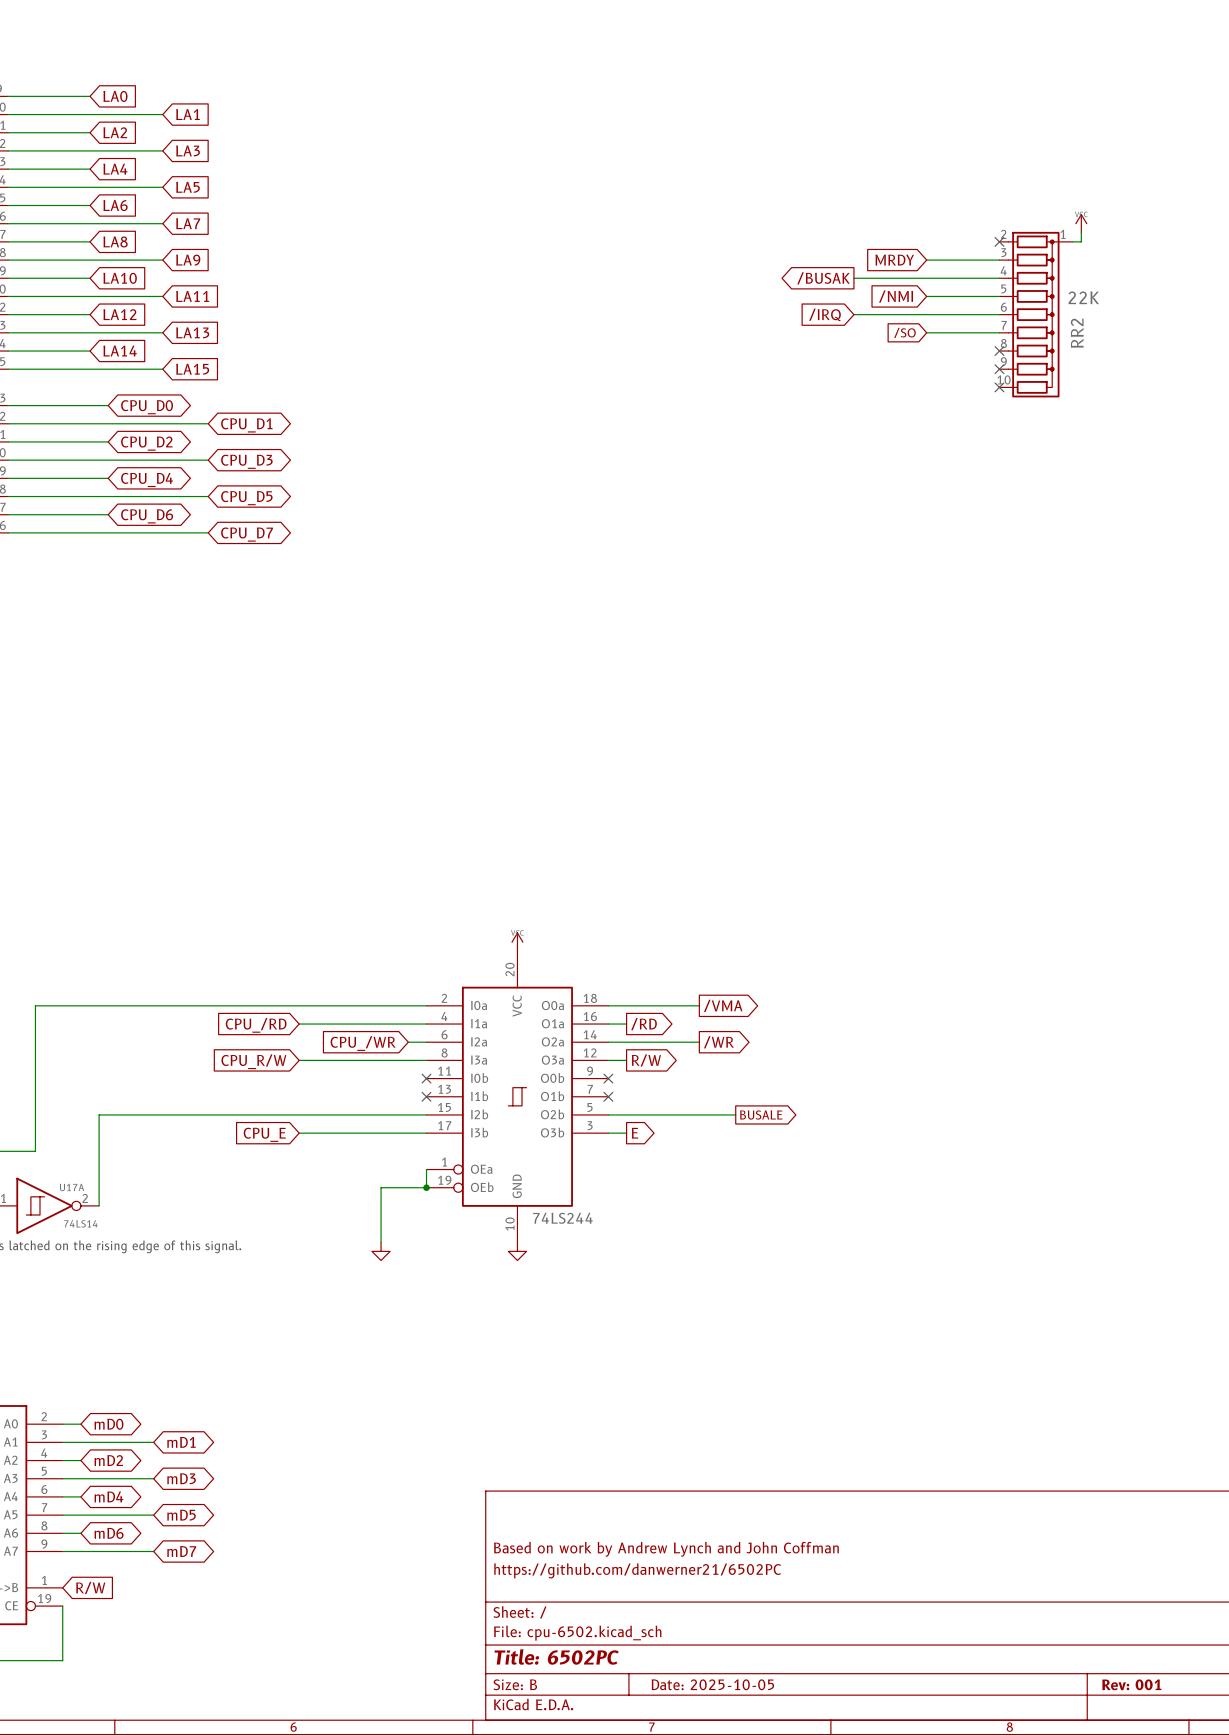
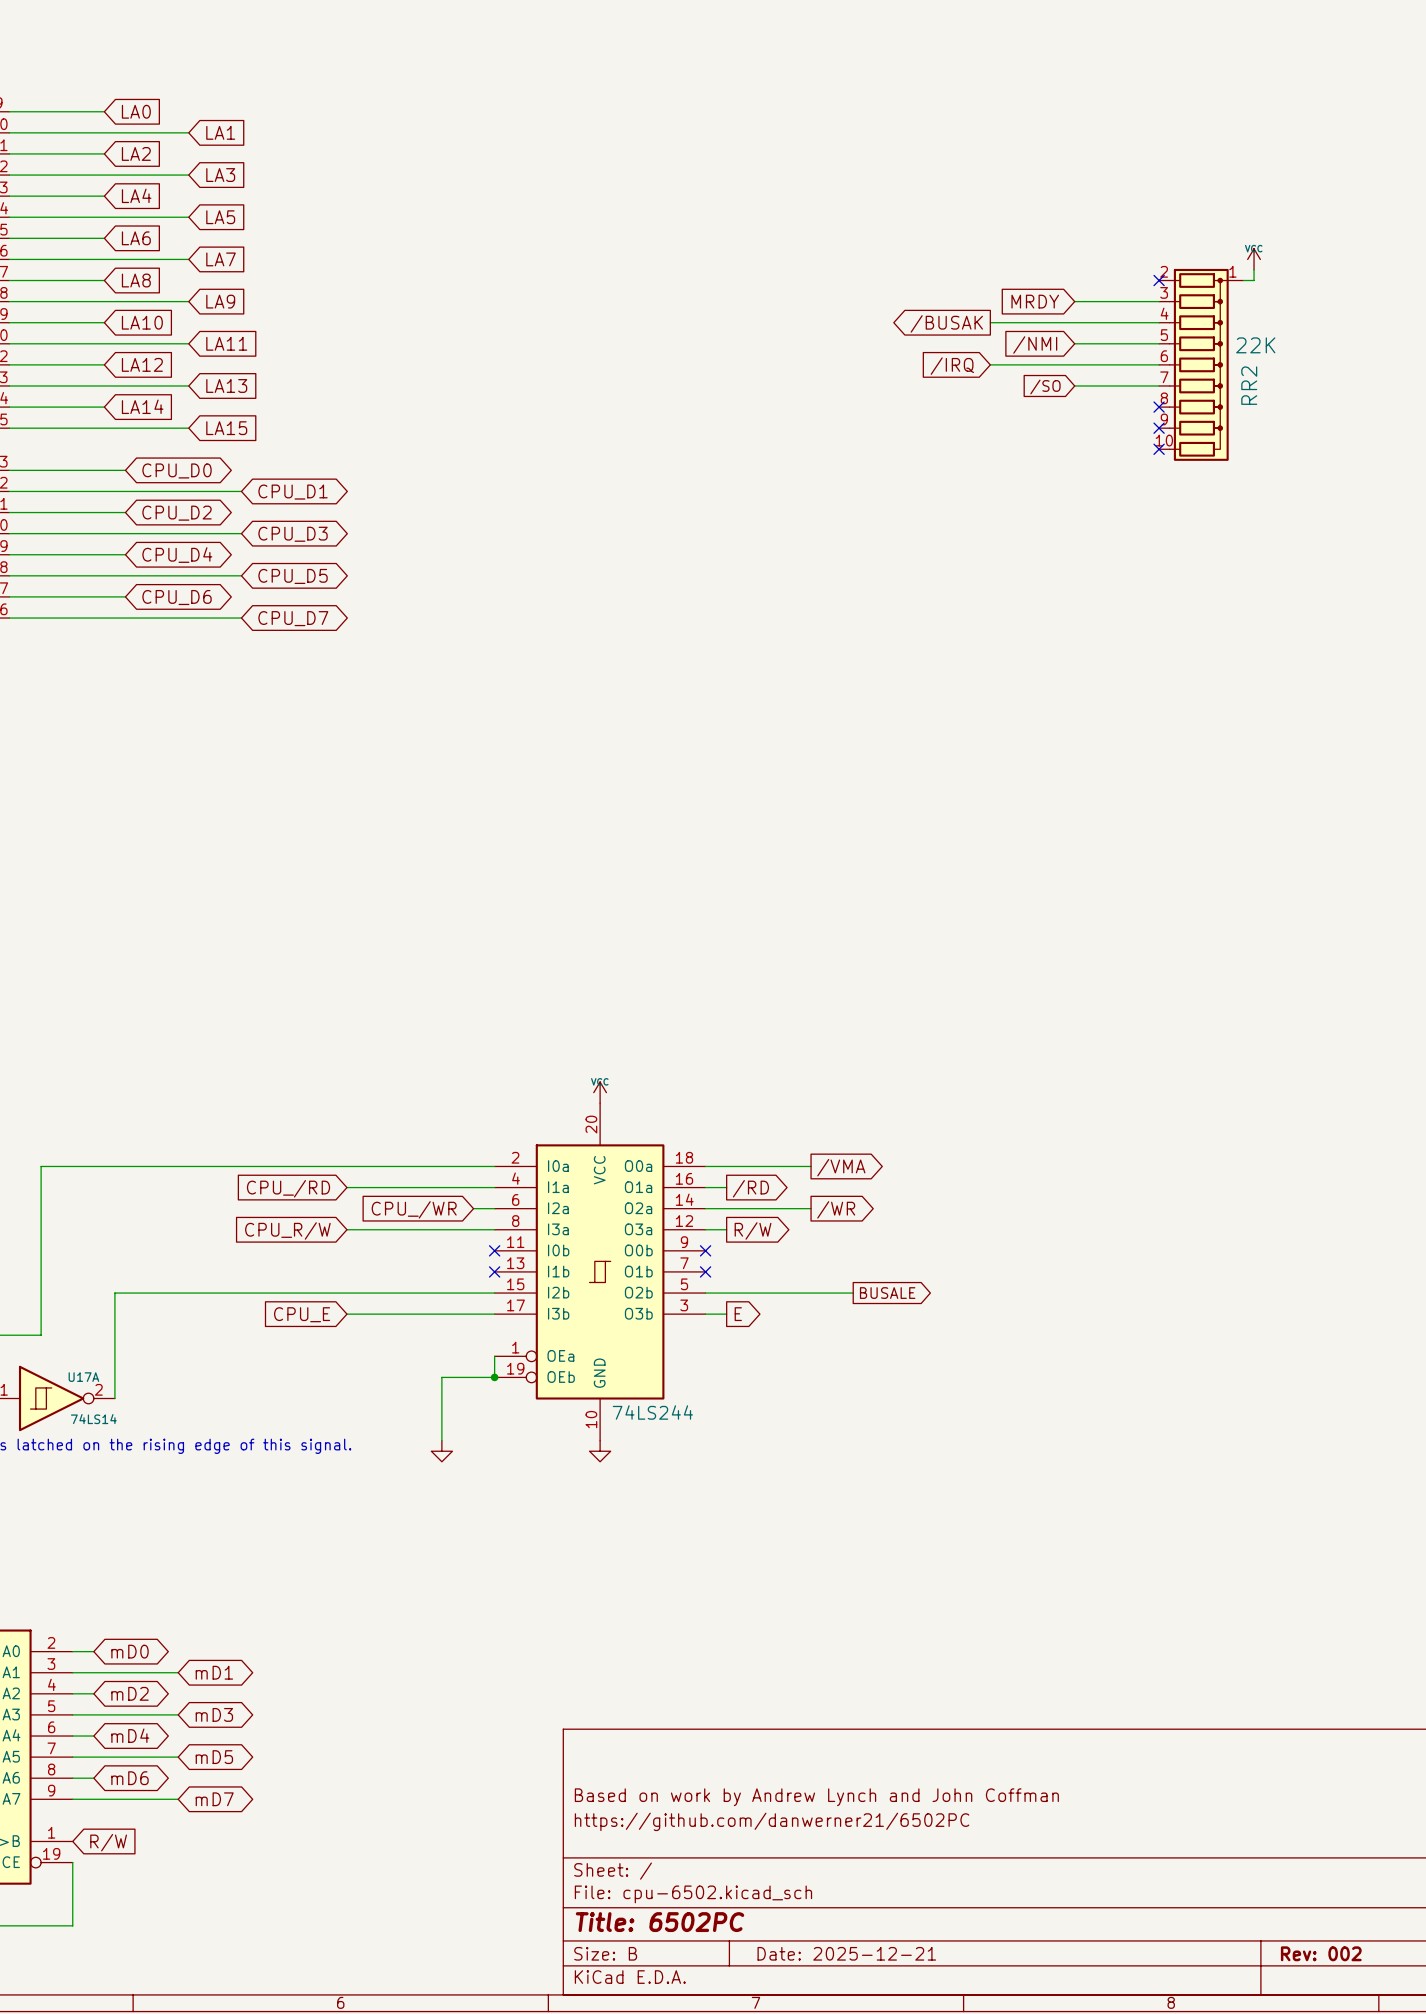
title block: Date: 2025-10-05 (712, 1684) -> Date: 2025-12-21 (846, 1953)
title block: Rev: 001 (1131, 1684) -> Rev: 002 (1321, 1953)

